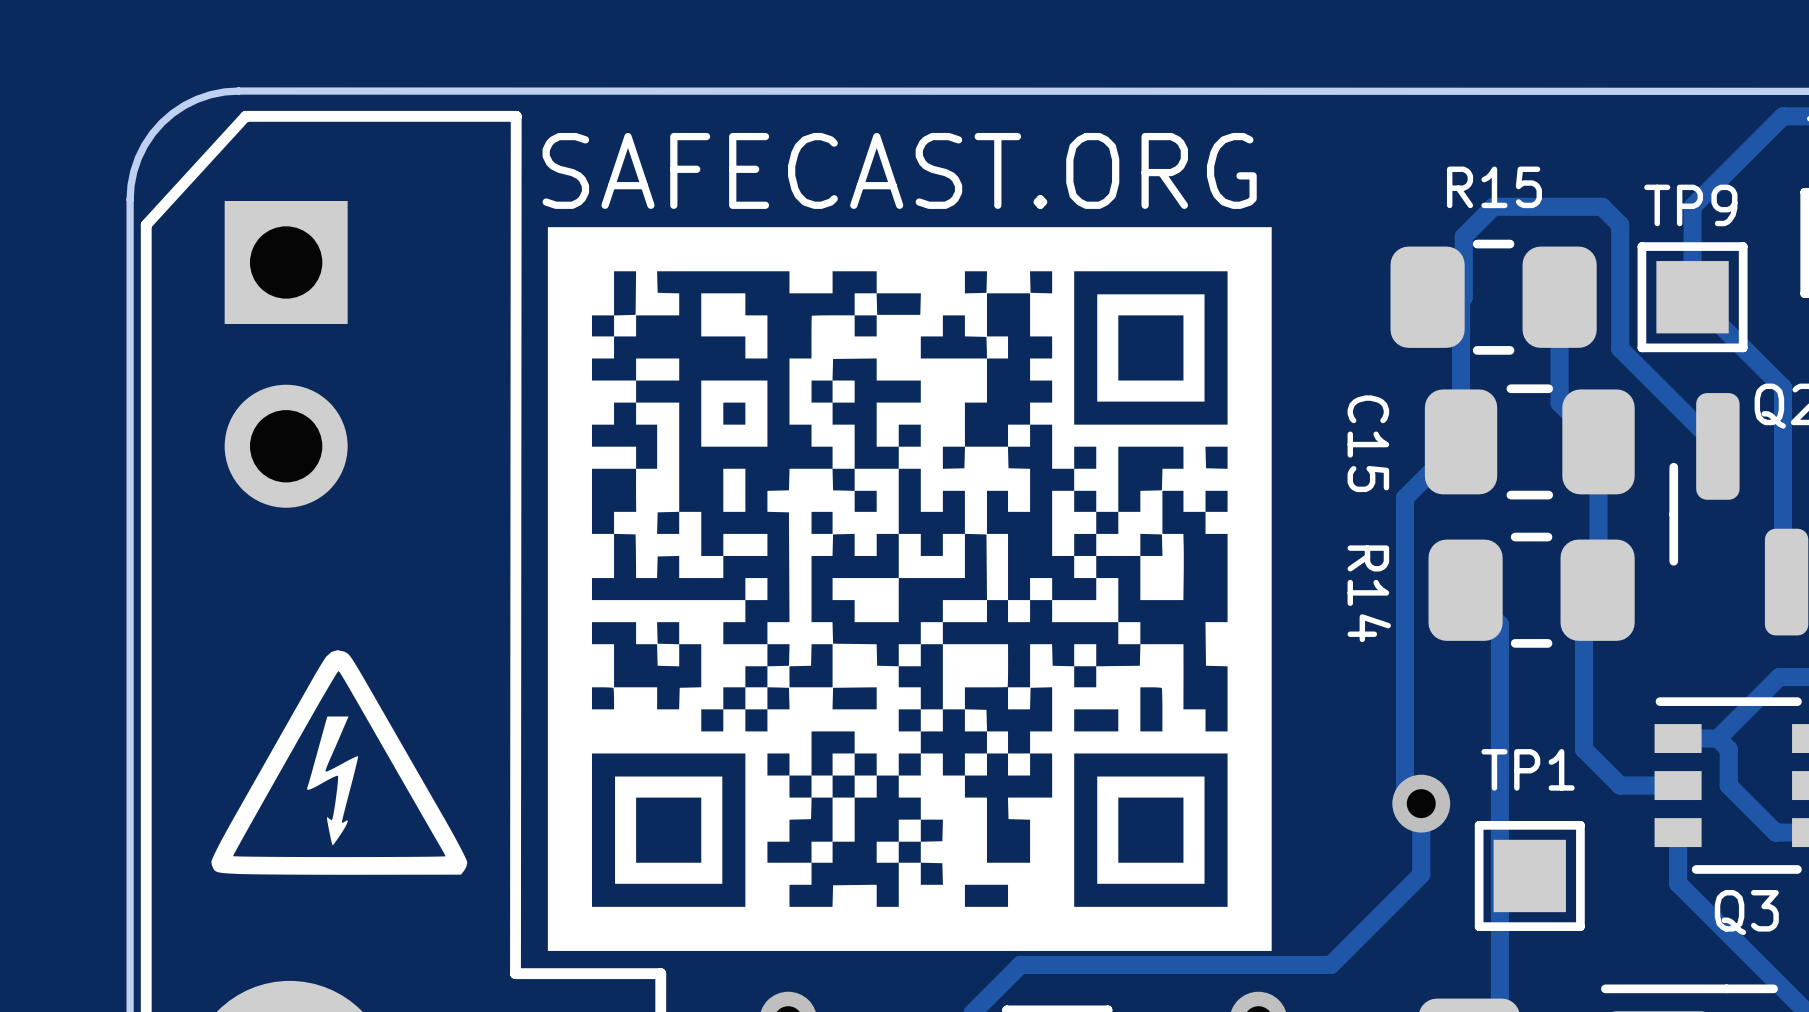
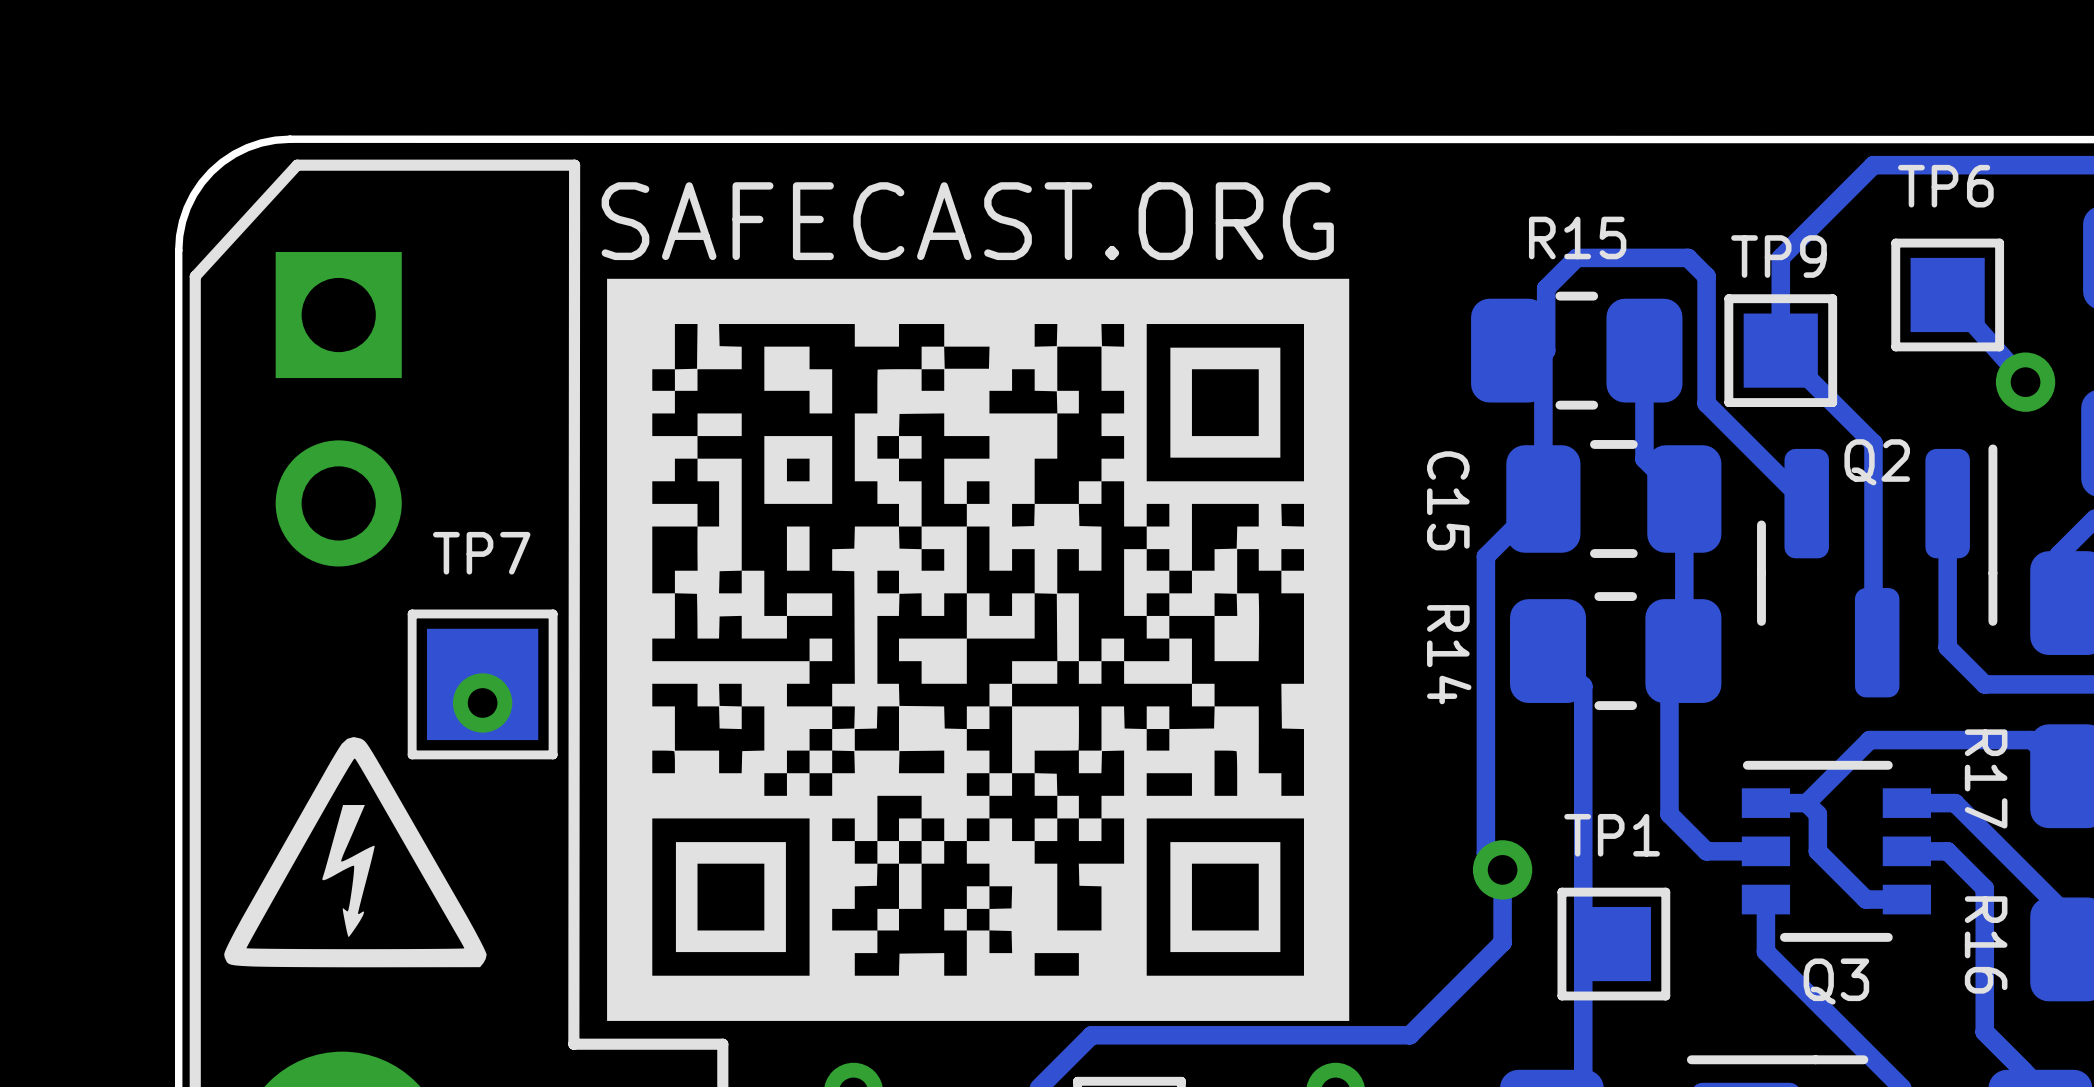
TP7: none -> (482, 684)
via: none -> (482, 702)
drawing position: (339, 762) -> (355, 852)

